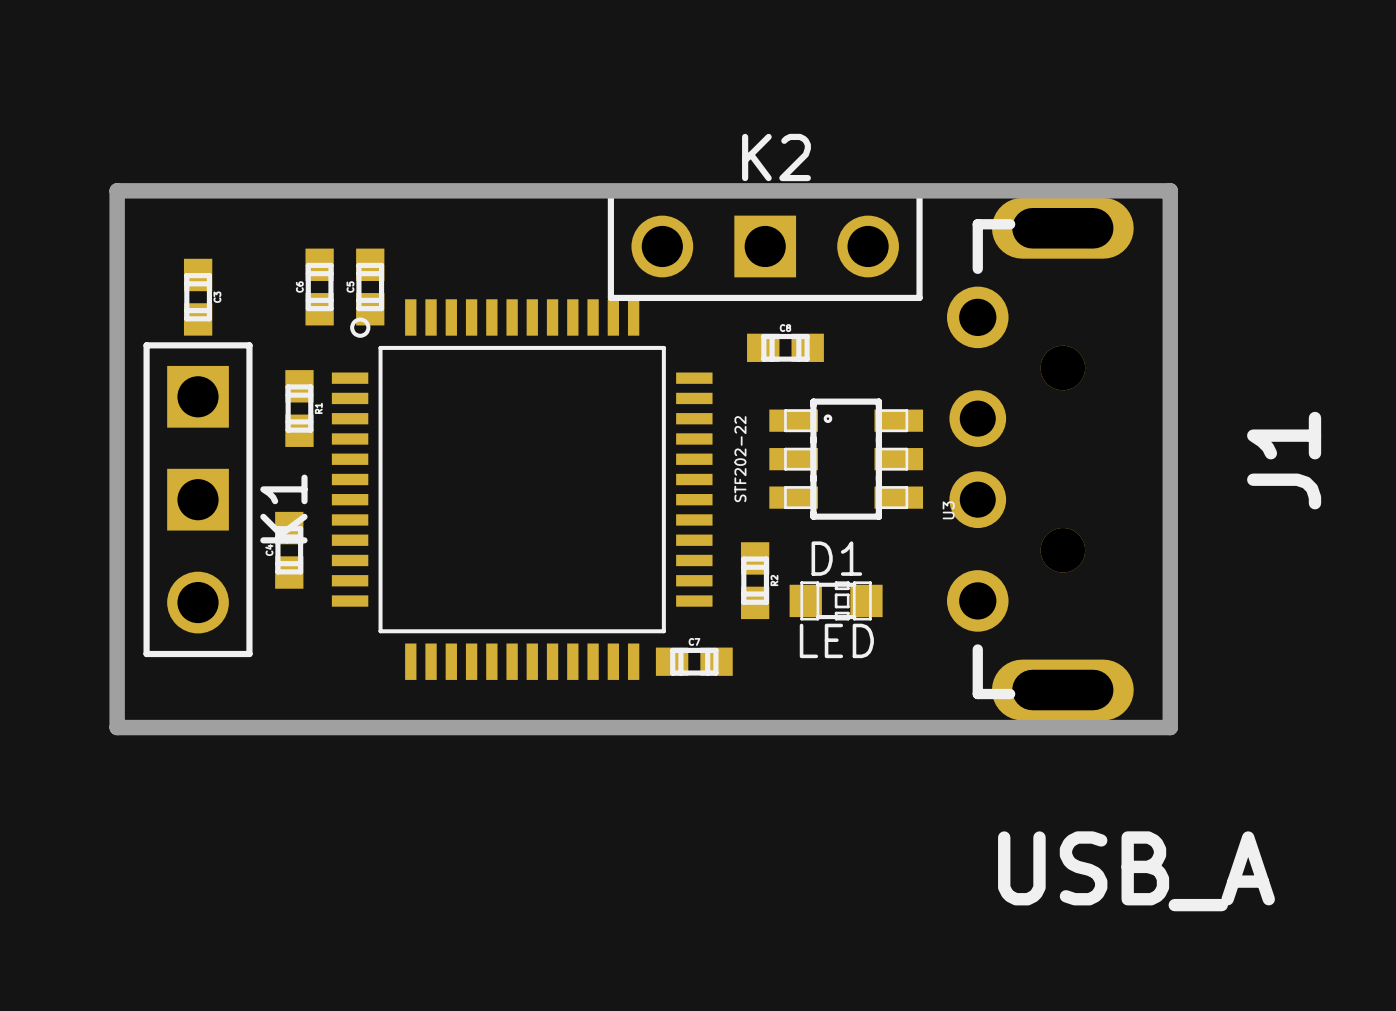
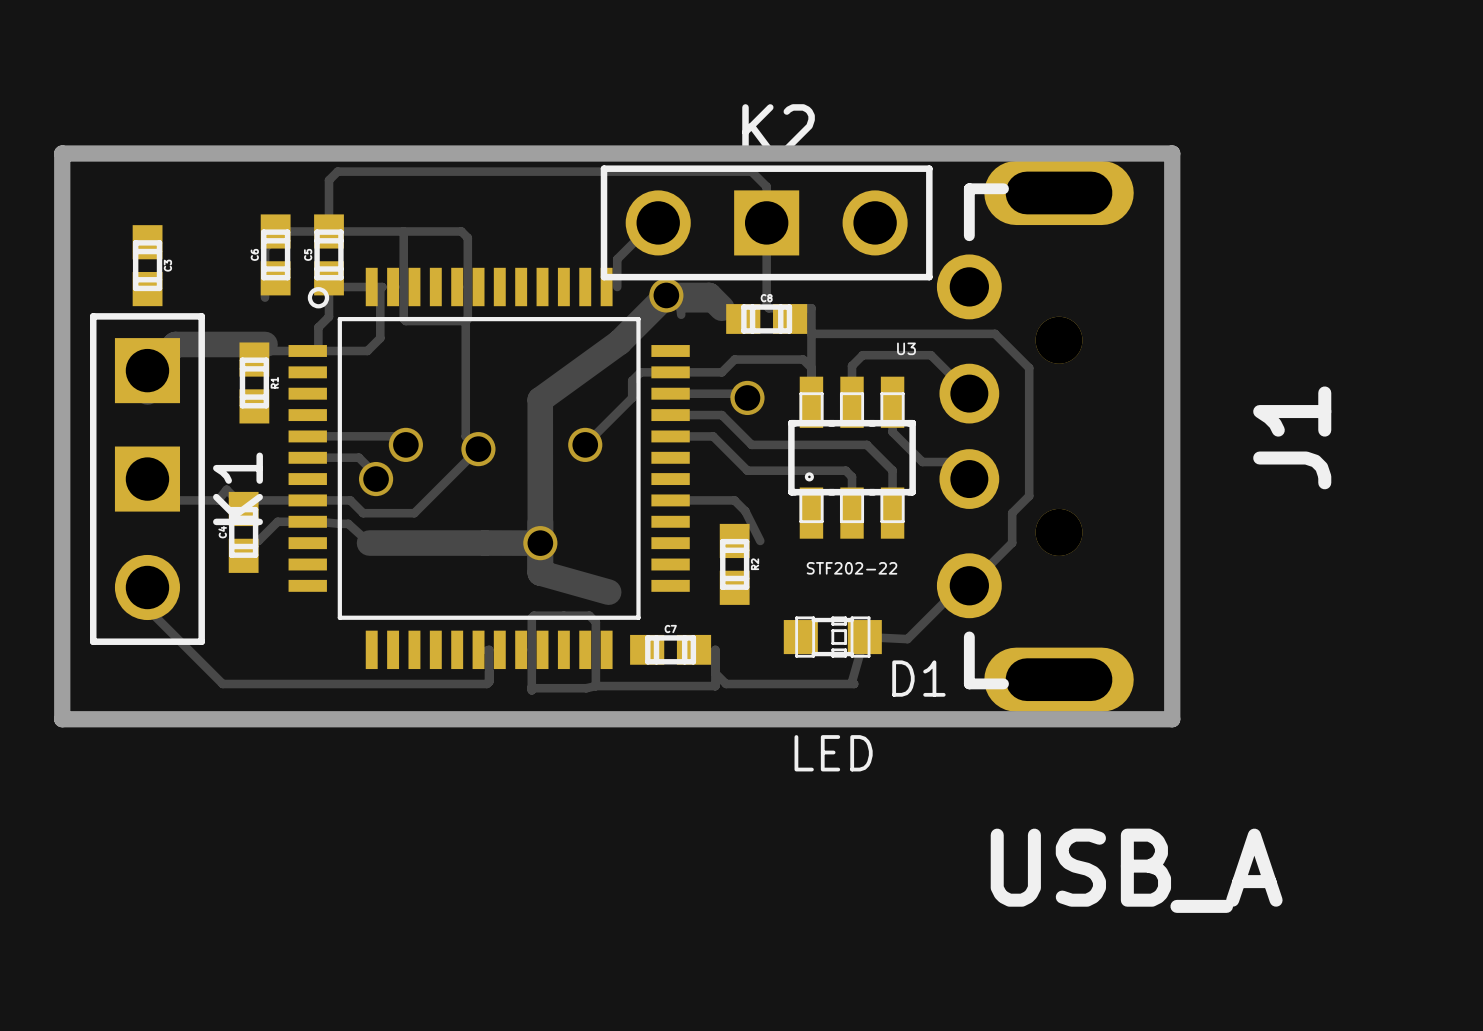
K2 position: (765, 246) -> (766, 222)
track: none -> (658, 222) (653, 222) (617, 259) (617, 287)
track: none -> (329, 231) (329, 180) (337, 171) (751, 171) (766, 186) (766, 306) (768, 308) (811, 308) (811, 402)
track: none -> (403, 231) (403, 318) (405, 321) (465, 321)
via: none -> (666, 295)
track: none -> (265, 297) (265, 248) (282, 231) (461, 231) (467, 237) (467, 318) (465, 321)
track: none -> (681, 314) (680, 308) (721, 308) (709, 295) (666, 295) (619, 342) (540, 399)
track: none -> (465, 321) (465, 436) (478, 449) (414, 513) (363, 513) (350, 500) (237, 500) (226, 489) (218, 500) (147, 500)
track: none -> (811, 333) (995, 333) (1029, 368) (1029, 496) (1012, 513) (1012, 542) (969, 585) (960, 585) (907, 639) (864, 637) (852, 681) (854, 684) (726, 684) (715, 673)
track: none -> (318, 350) (318, 327) (329, 316) (329, 278) (337, 287) (382, 287) (380, 289) (380, 338) (367, 350) (271, 350) (265, 344) (175, 344) (147, 372) (147, 391)
track: none -> (811, 367) (803, 359) (734, 359) (721, 372) (640, 372) (632, 380) (632, 397) (585, 444)
track: none -> (681, 393) (738, 393) (747, 397)
track: none -> (969, 393) (930, 355) (862, 355) (852, 365) (852, 402)
via: none -> (747, 397)
track: none -> (540, 399) (540, 572)
track: none -> (892, 402) (892, 432) (922, 462) (952, 462) (969, 479)
track: none -> (681, 415) (721, 415) (751, 444) (866, 444) (892, 470) (892, 513)
track: none -> (318, 436) (393, 436) (405, 444)
track: none -> (681, 436) (713, 436) (747, 470) (845, 470) (852, 476) (852, 513)
U3 rotation: 0° (846, 459) -> 90° counterclockwise (852, 457)
via: none -> (405, 444)
via: none -> (585, 444)
via: none -> (478, 449)
track: none -> (318, 457) (358, 457) (371, 470) (376, 479)
via: none -> (376, 479)
track: none -> (681, 500) (734, 500) (745, 511) (760, 540)
track: none -> (256, 540) (277, 521) (318, 521) (348, 523) (369, 543) (540, 543)
D1 name position: D1 (836, 558) -> D1 (918, 678)
via: none -> (540, 543)
track: none -> (540, 572) (608, 592)
D1 position: (836, 600) -> (832, 637)
track: none -> (147, 608) (222, 684) (487, 684) (489, 681) (489, 649) (486, 650)
D1 value position: LED (836, 640) -> LED (833, 753)
track: none -> (715, 649) (715, 686) (595, 686)
track: none -> (595, 686) (586, 688) (531, 688) (531, 690) (531, 617) (533, 615) (589, 615) (595, 622) (595, 686)

